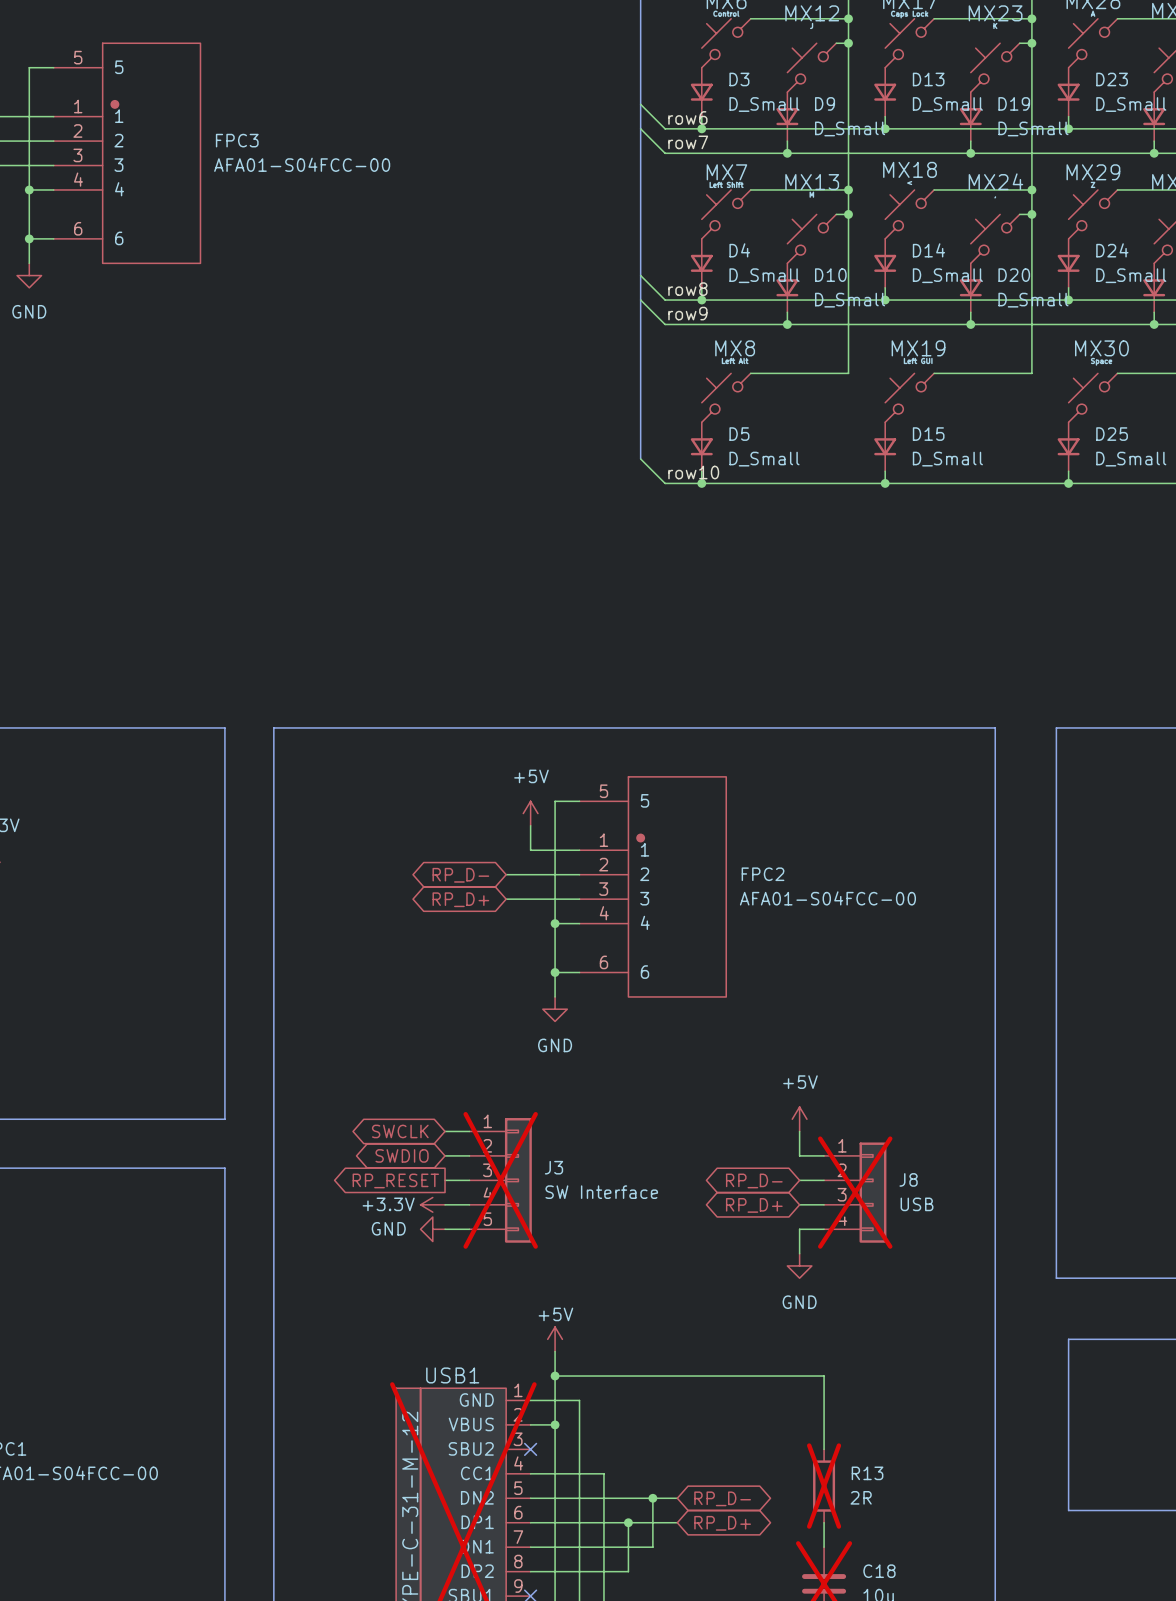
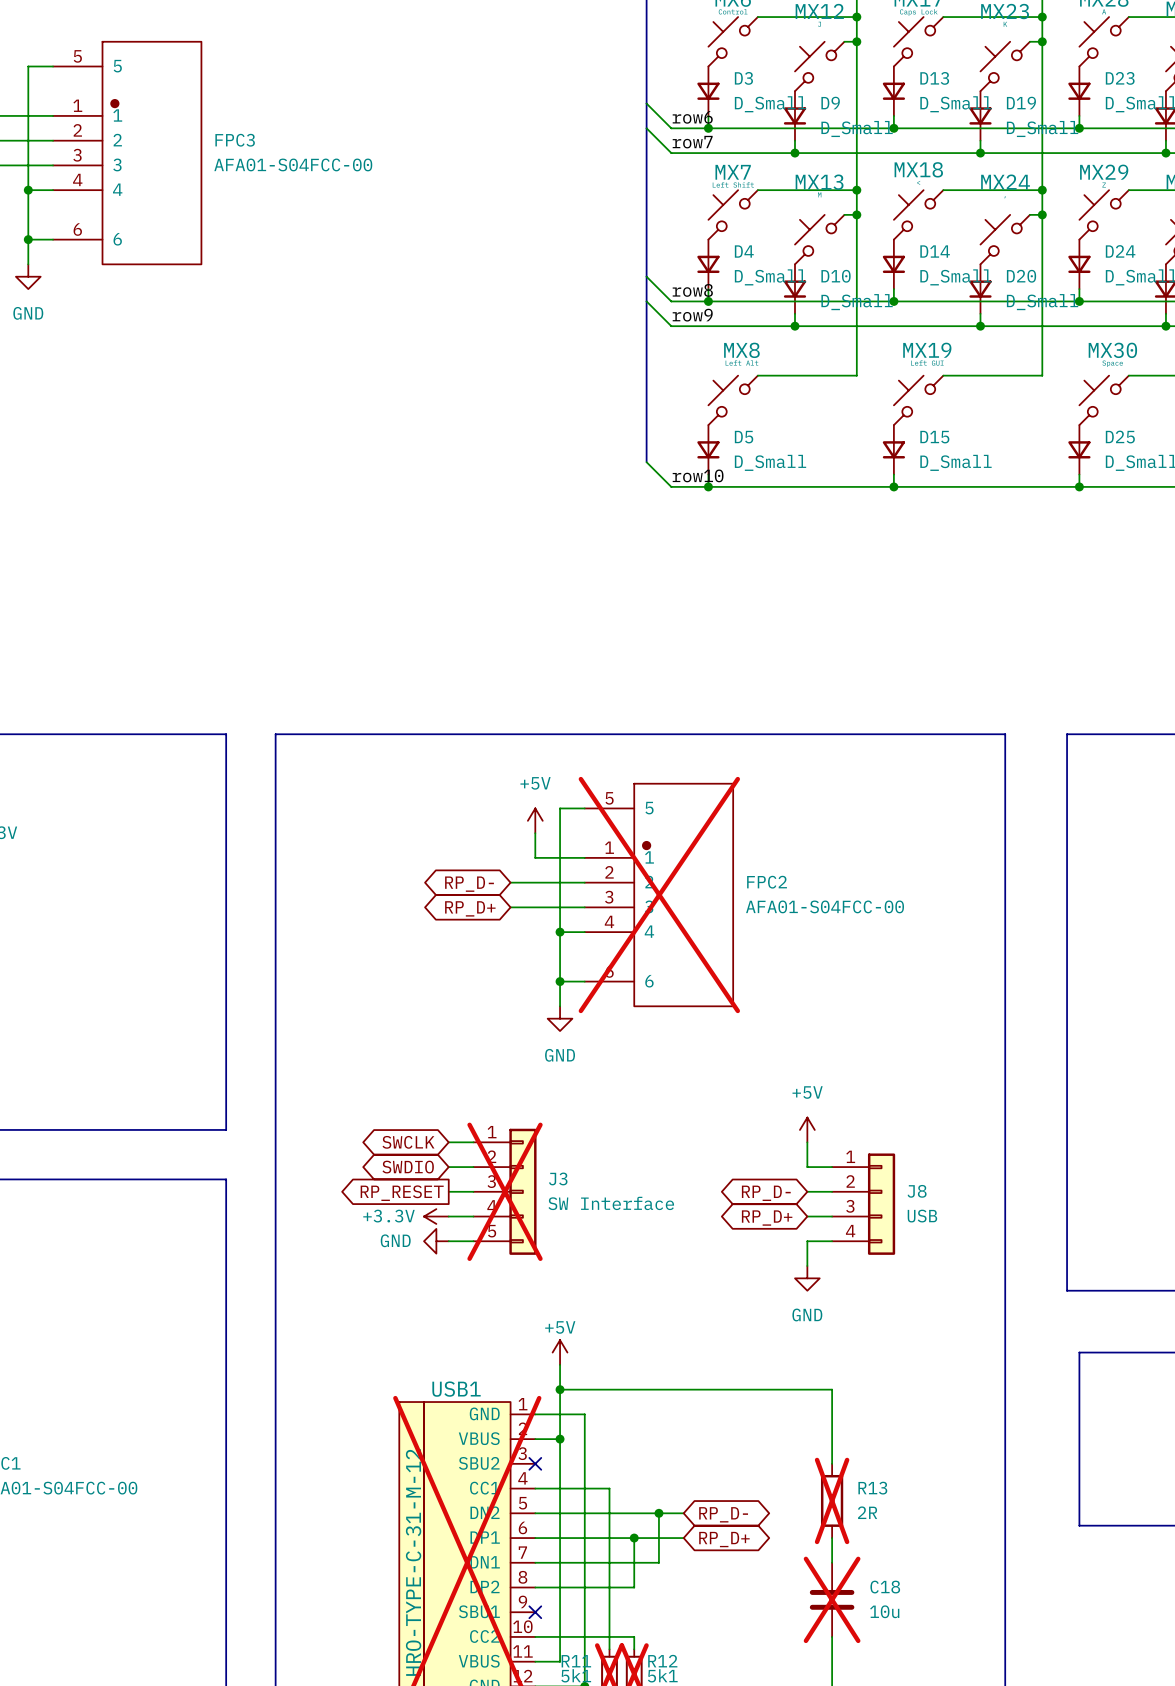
FPC2 do-not-place cross: none -> (659, 895)
J8 do-not-place cross: (855, 1192) -> none

